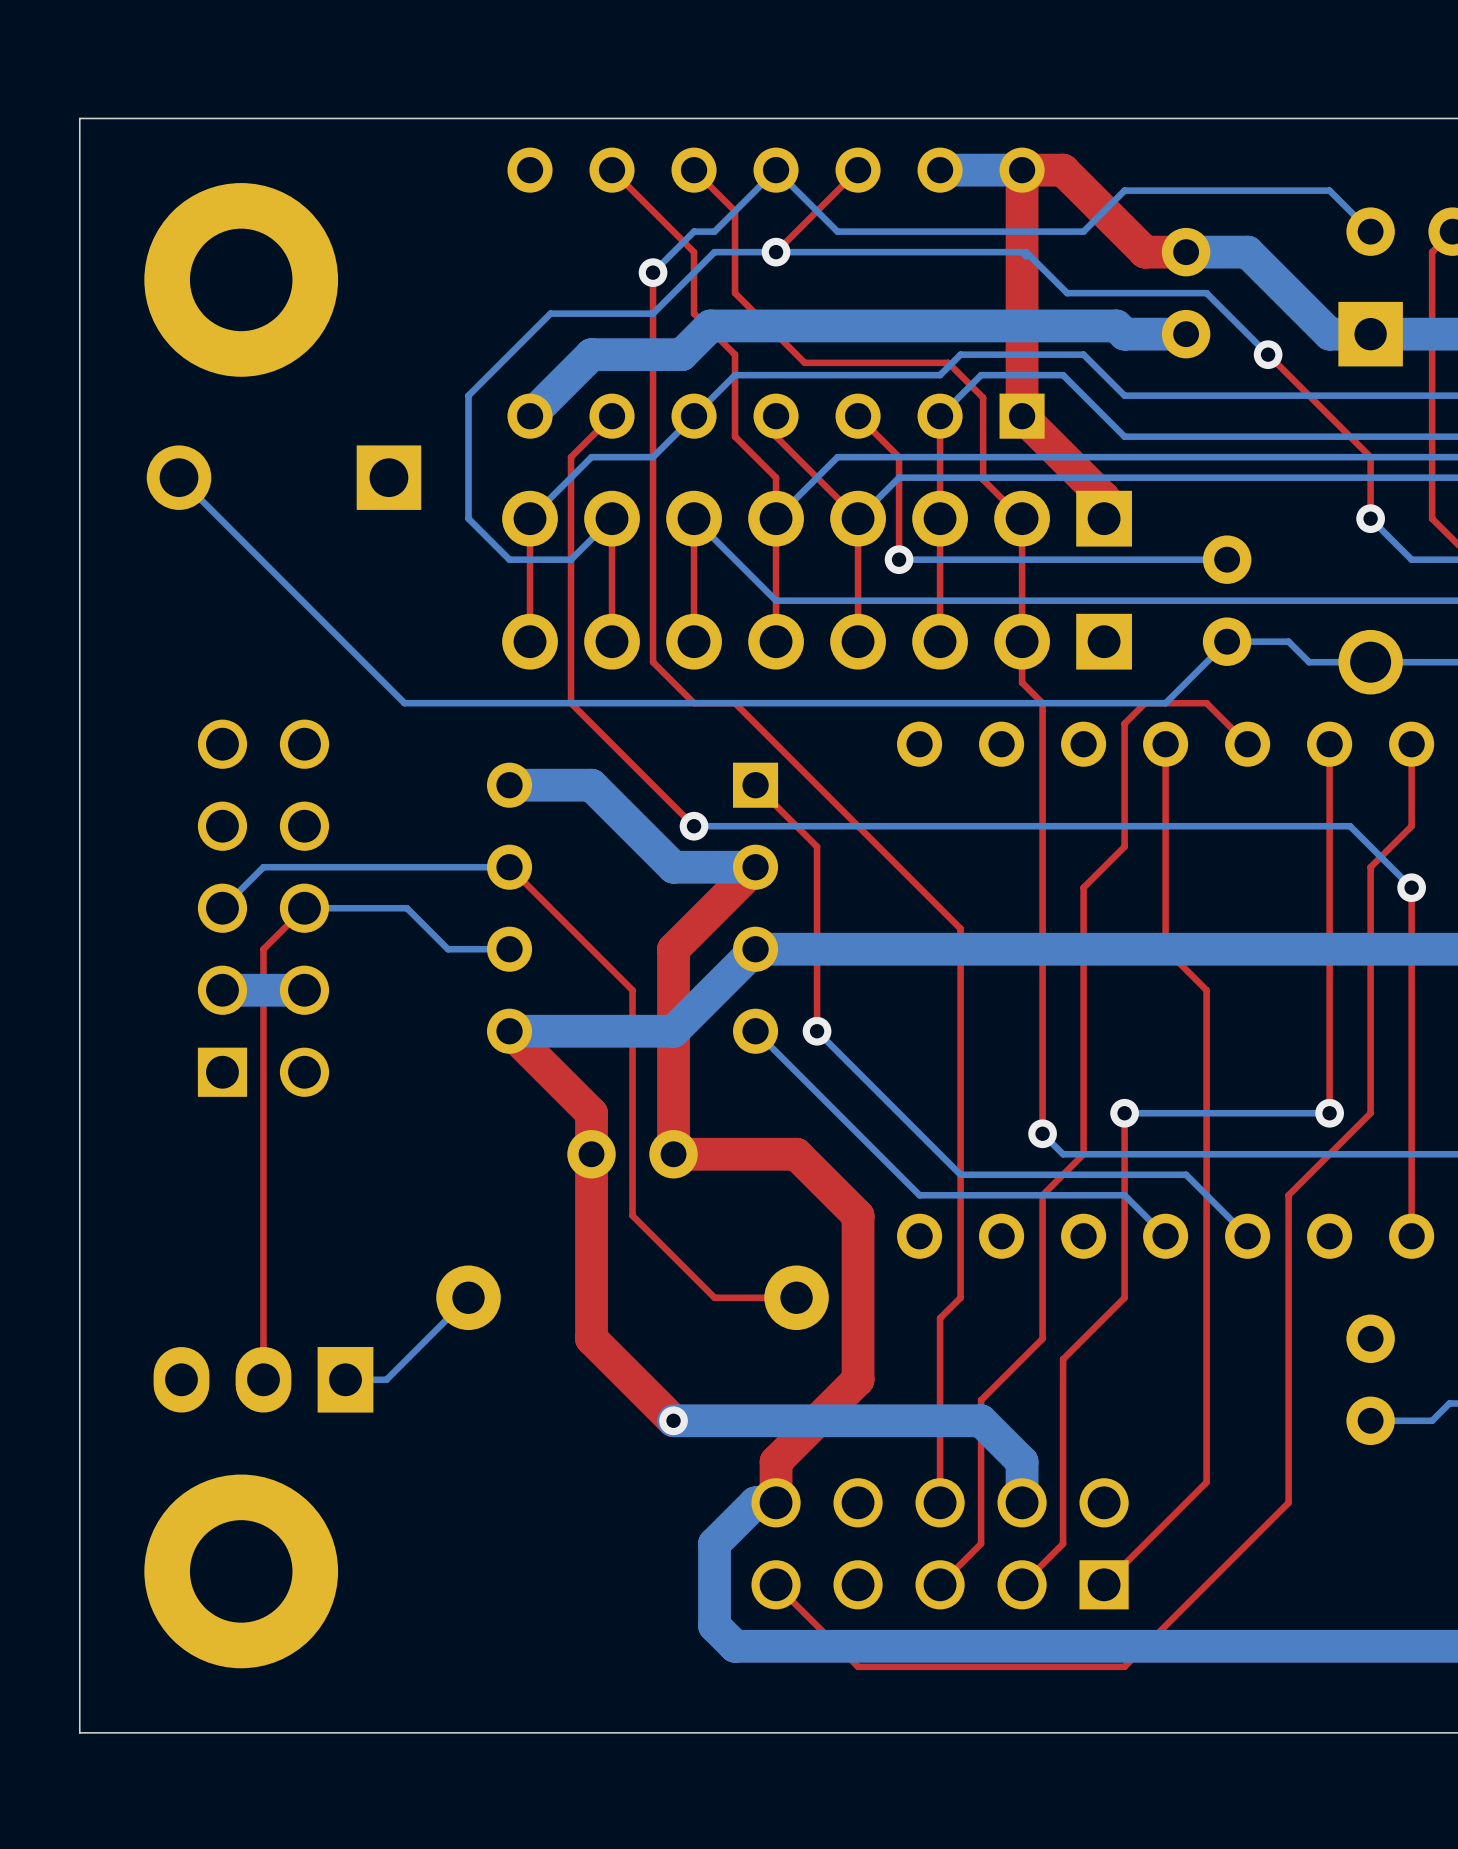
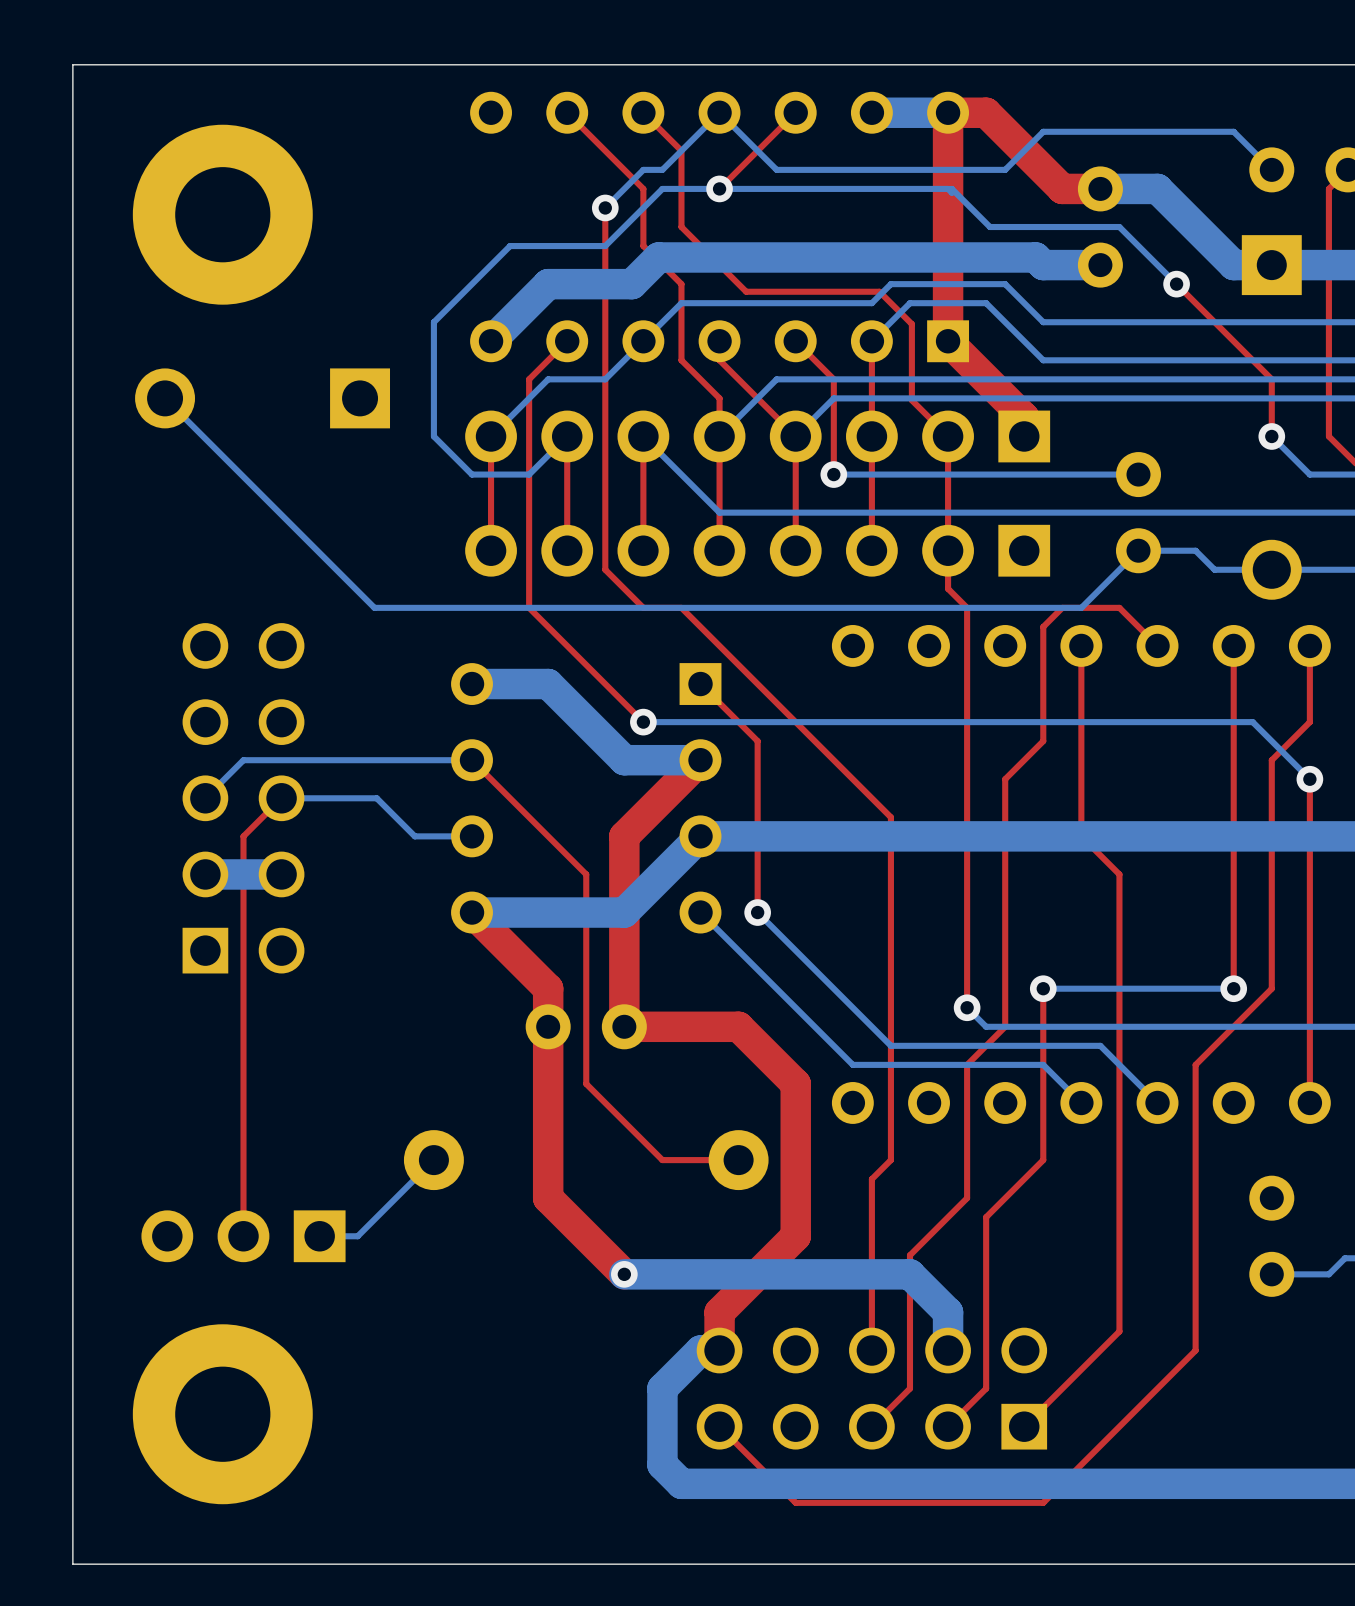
part footprint: [153, 1346, 374, 1413] -> [141, 1210, 346, 1263]

